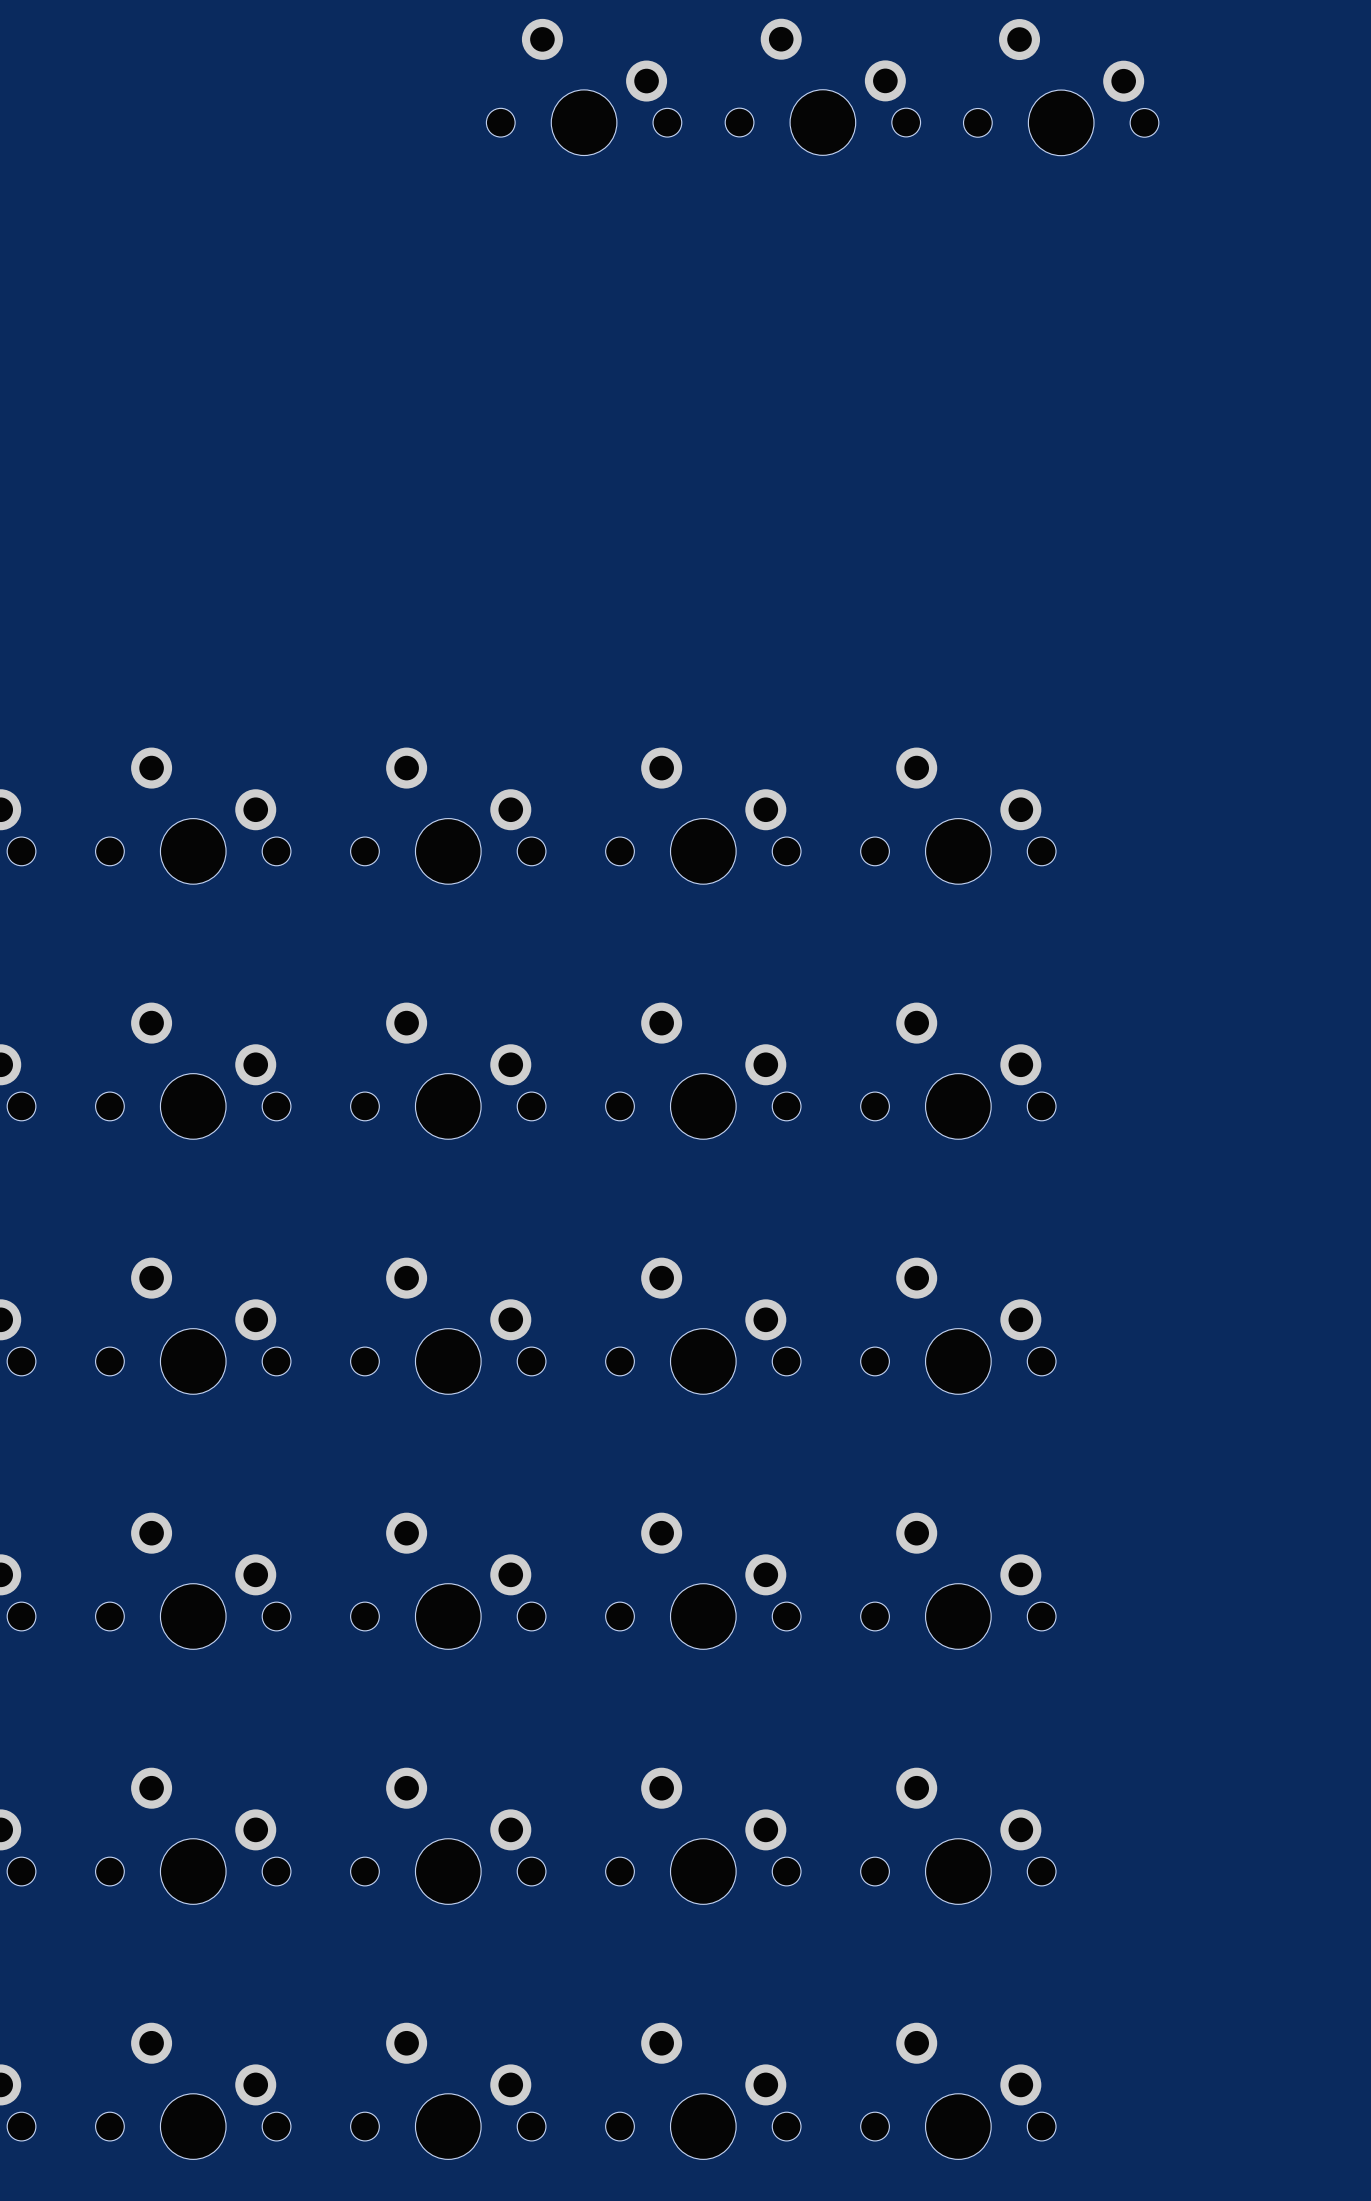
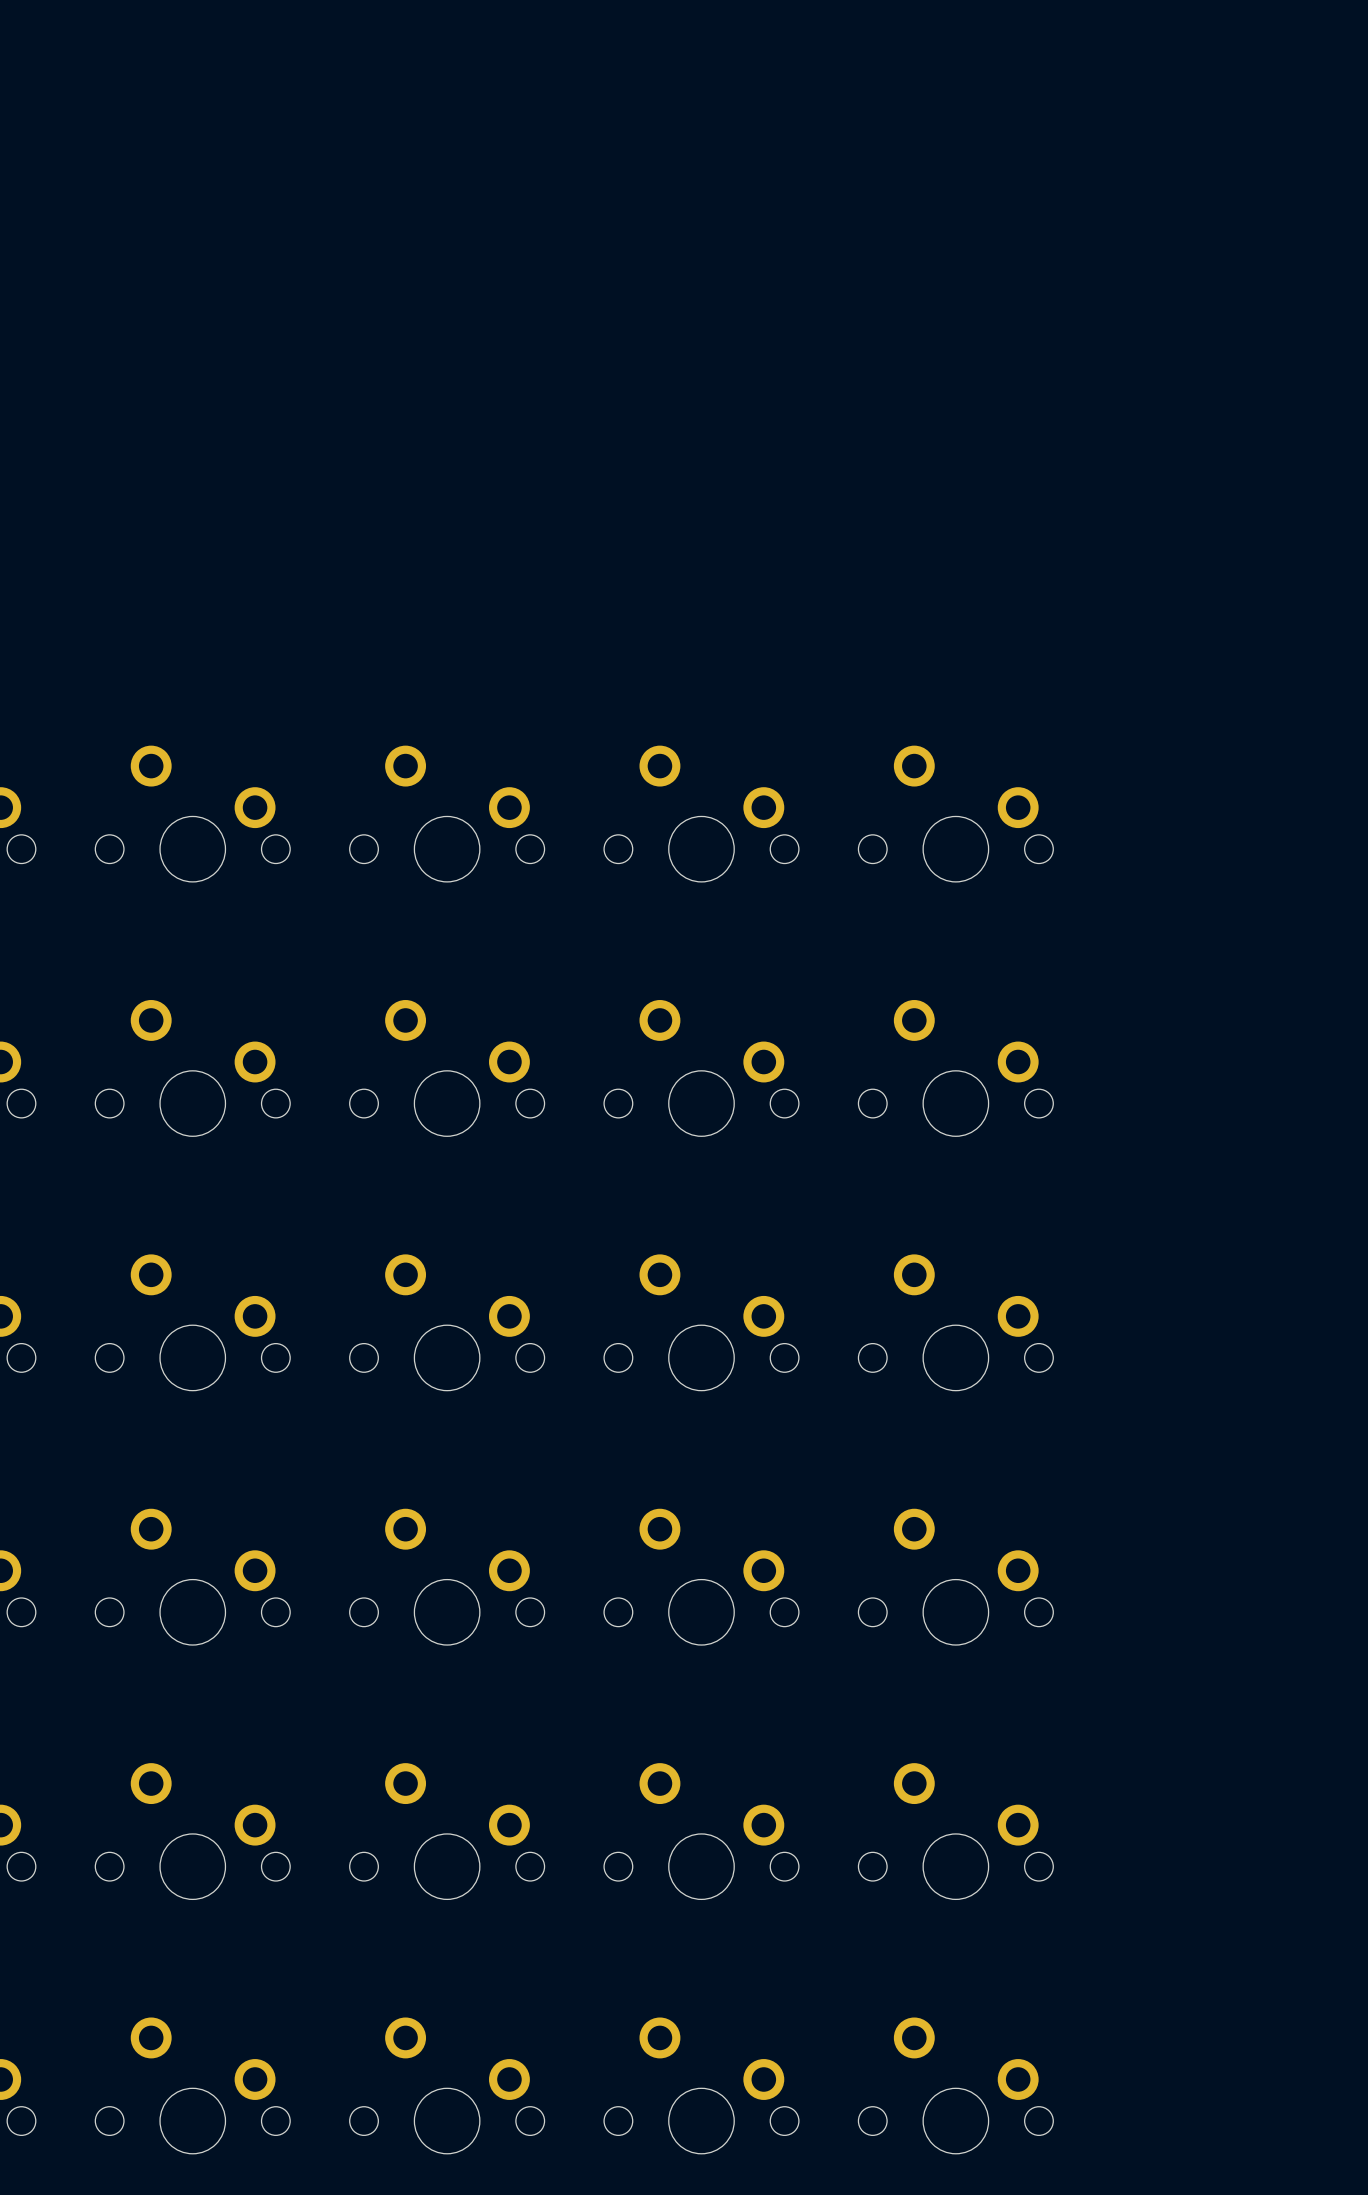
part: (584, 87) -> none
part: (822, 87) -> none
part: (1061, 87) -> none

